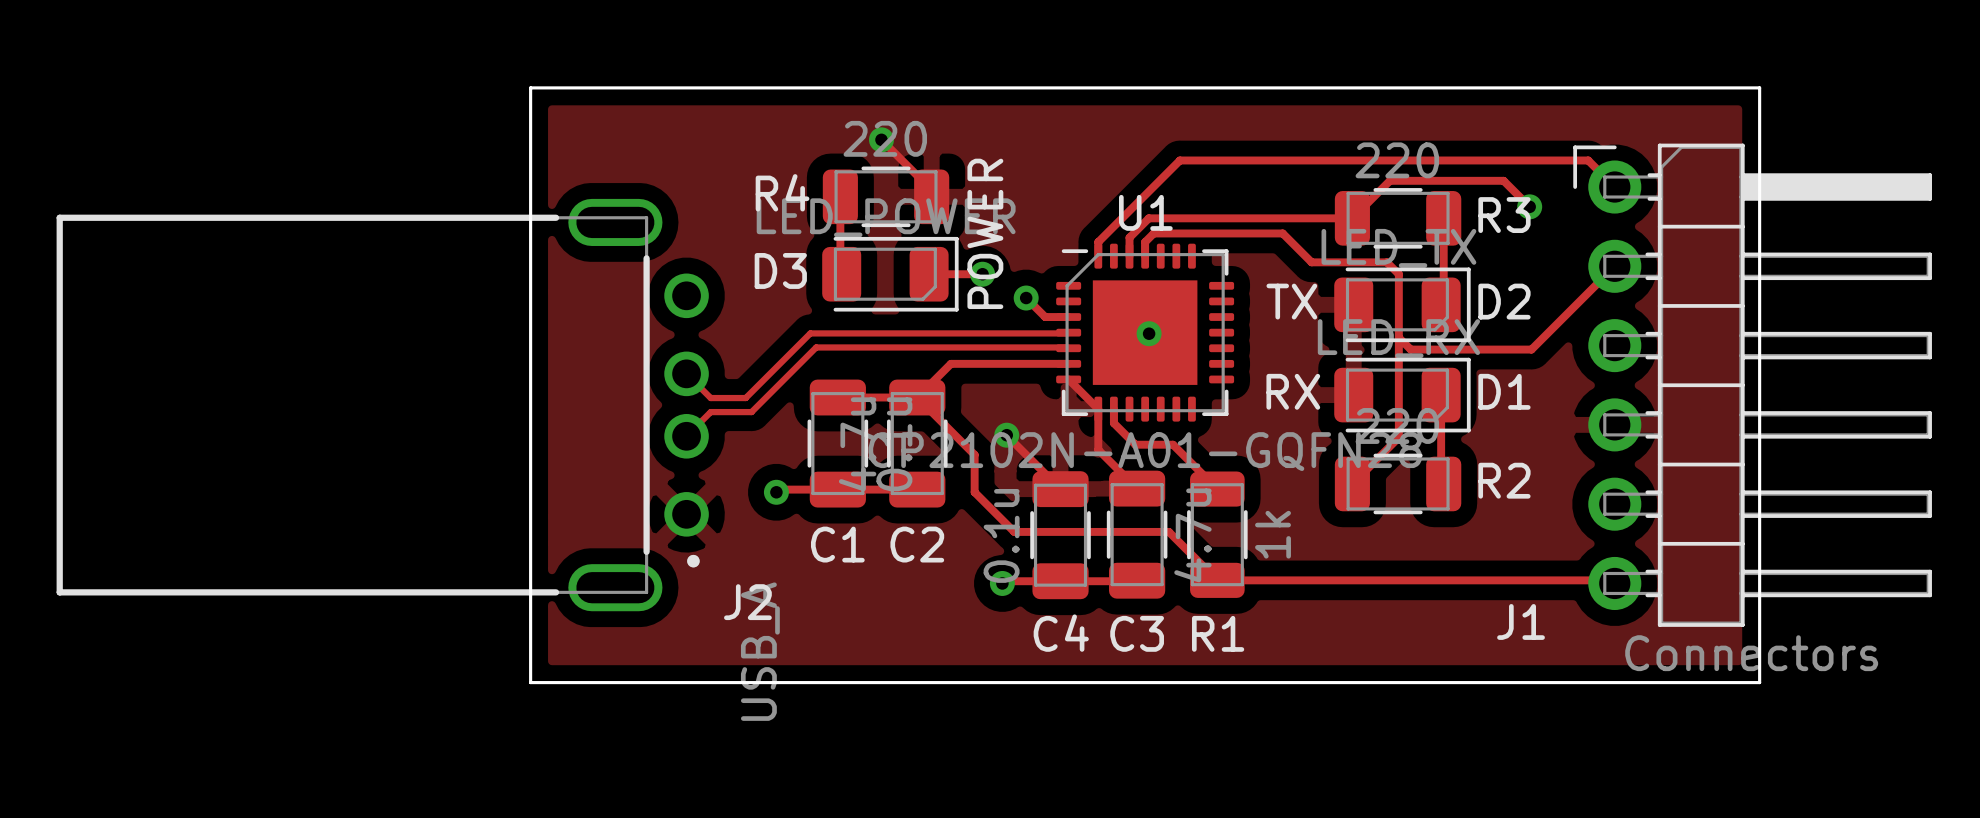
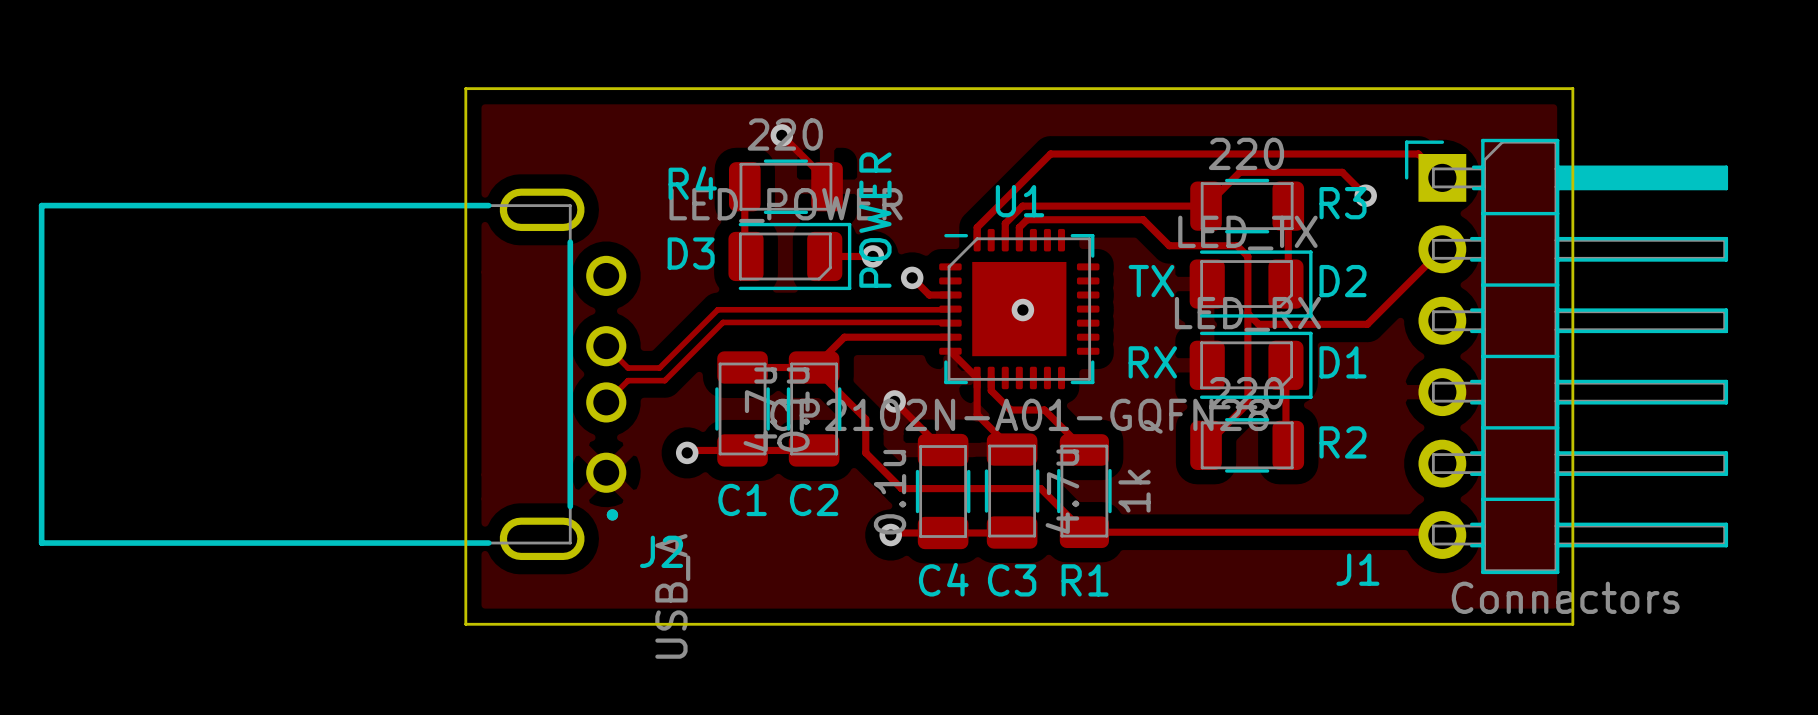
J1 footprint: [1573, 143, 1932, 627] -> [1404, 138, 1729, 575]

